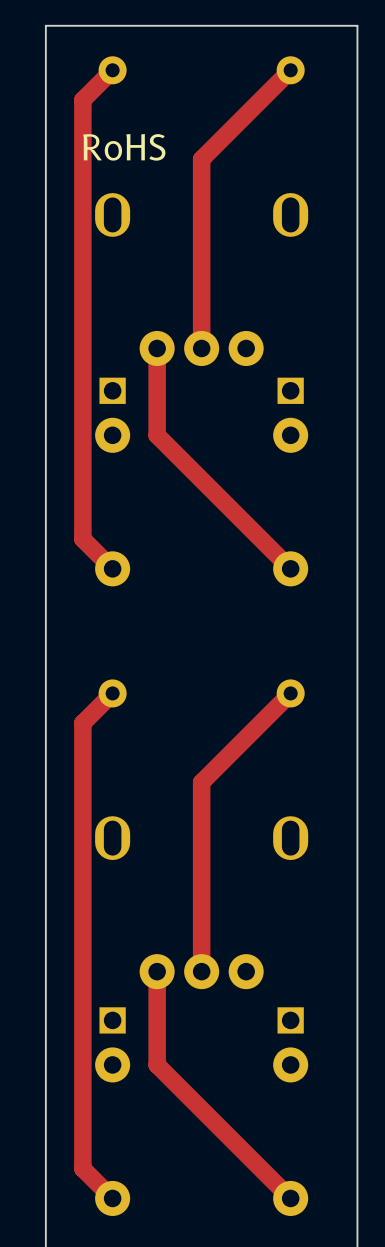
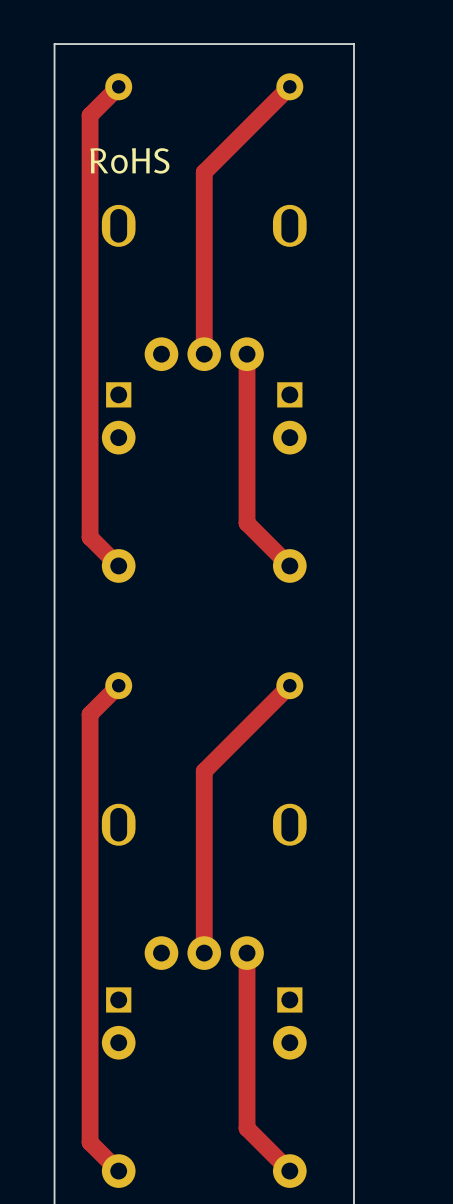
top track: (157, 348) (157, 435) (246, 524) -> (247, 354) (247, 523)
top track: (157, 971) (157, 1064) (246, 1153) -> (247, 959) (247, 1128)

